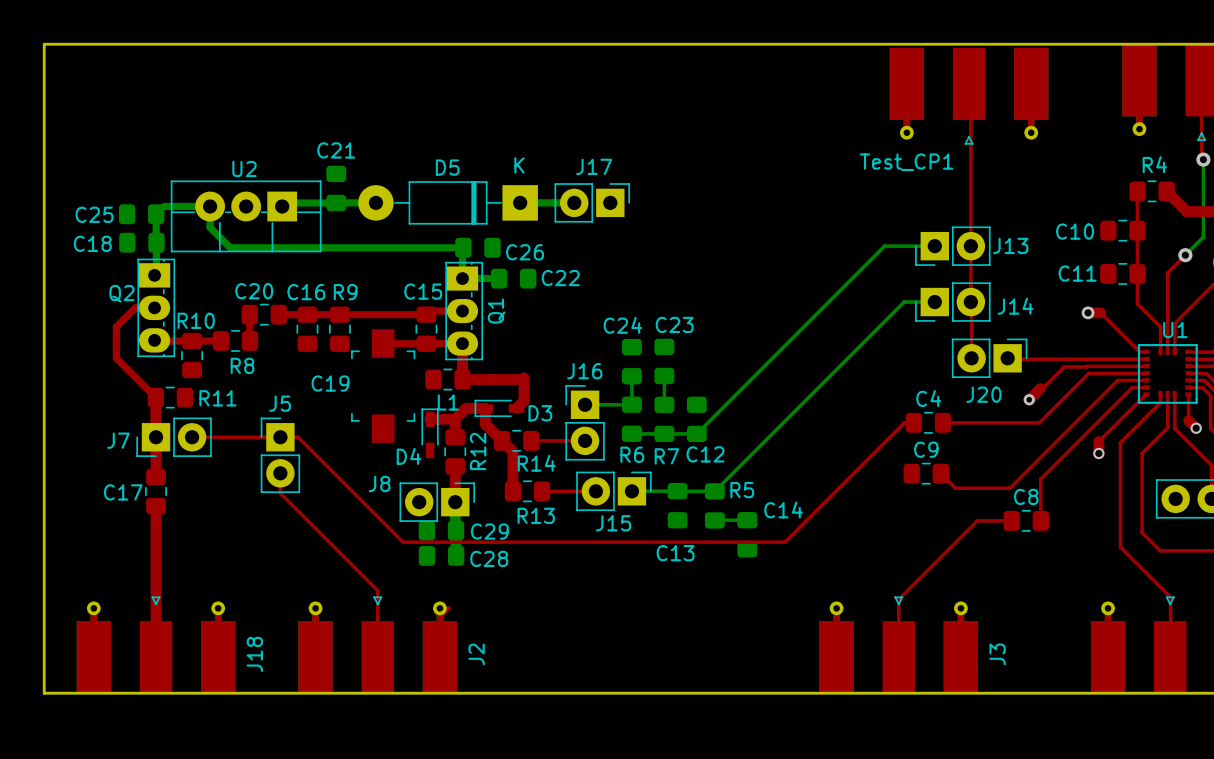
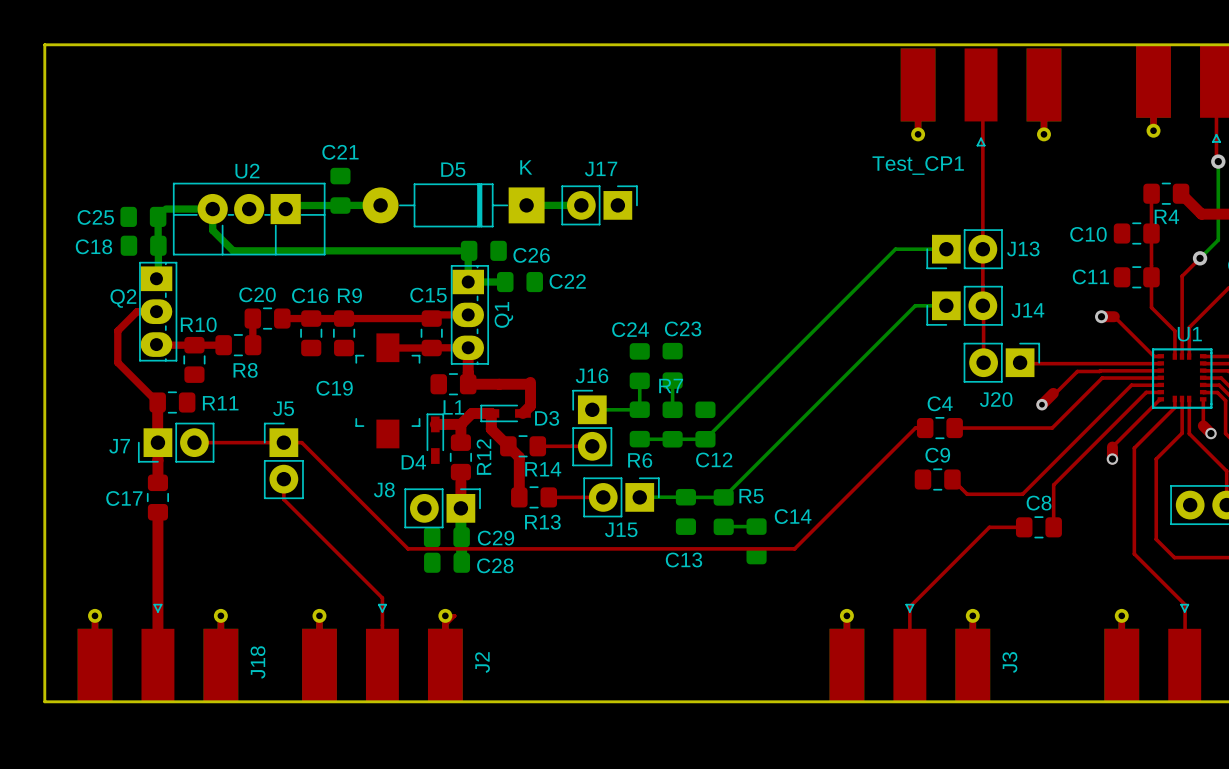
R4 name position: R4 (1154, 164) -> R4 (1166, 216)
R7 name position: R7 (666, 456) -> R7 (671, 385)

